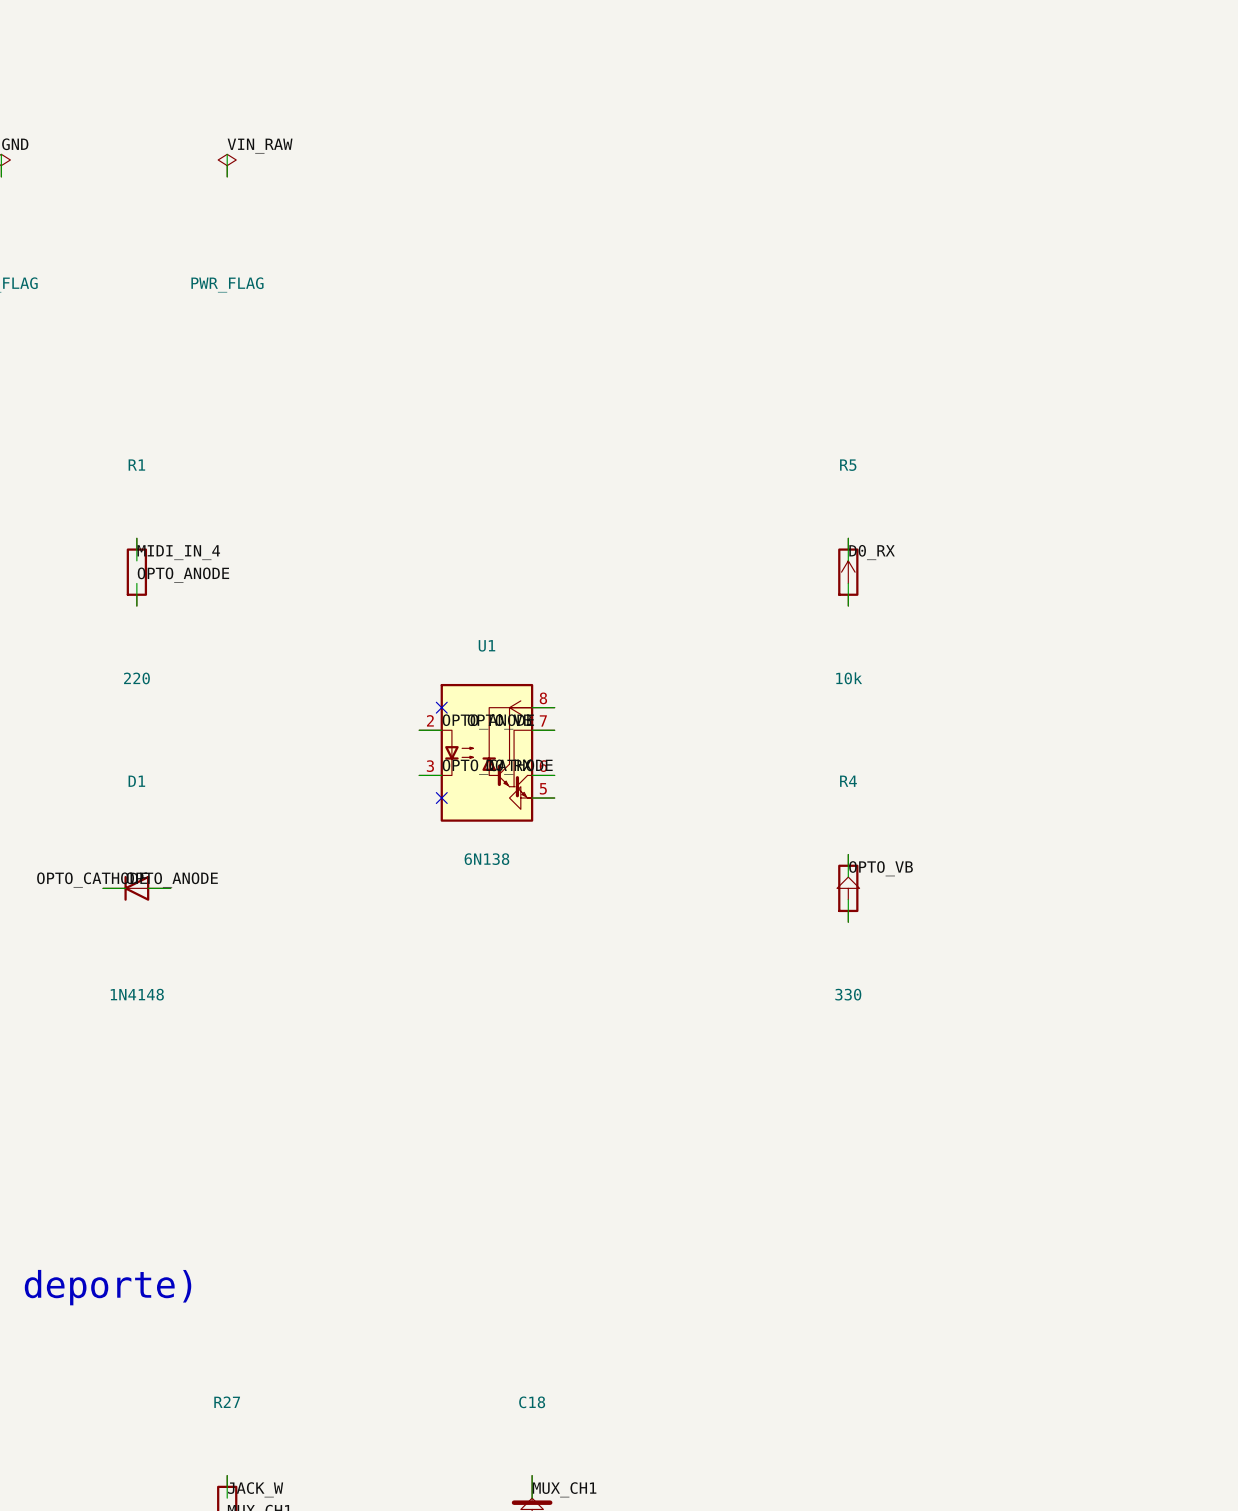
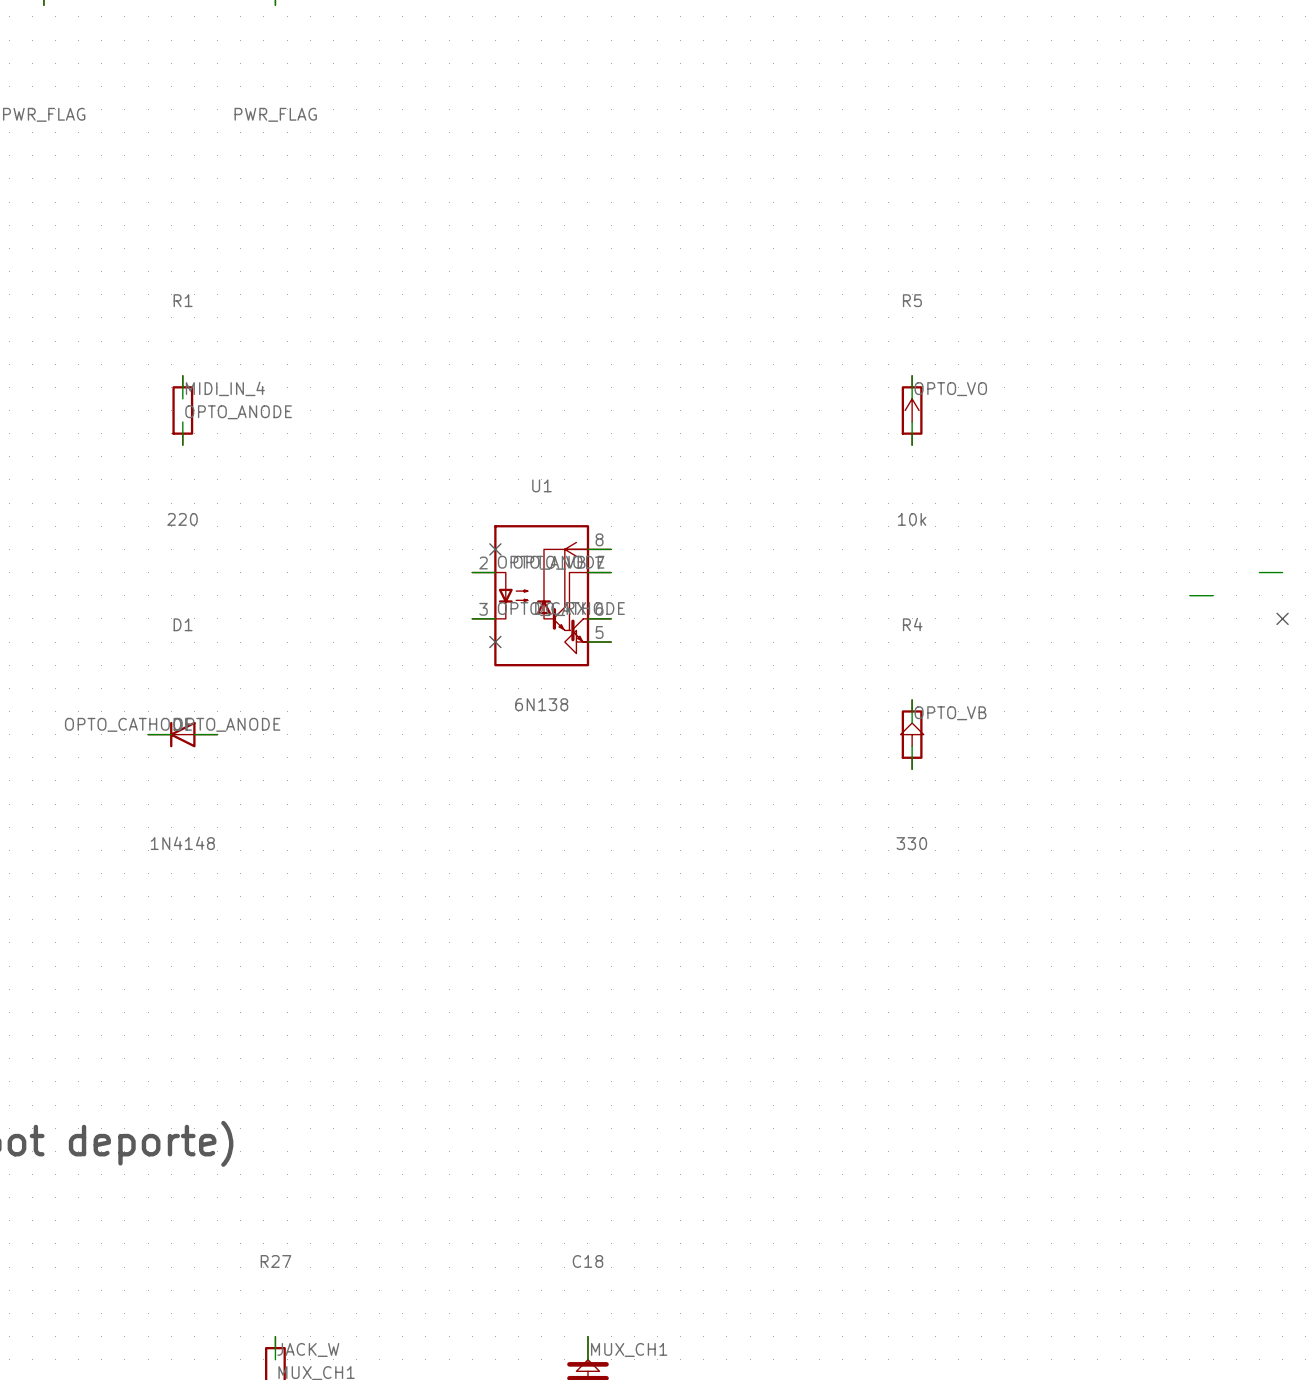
label: D0_RX (872, 552) -> OPTO_VO (950, 389)
wire: none -> (1259, 572) (1282, 572)
wire: none -> (1189, 595) (1213, 595)
no-connect mark: none -> (1282, 618)

